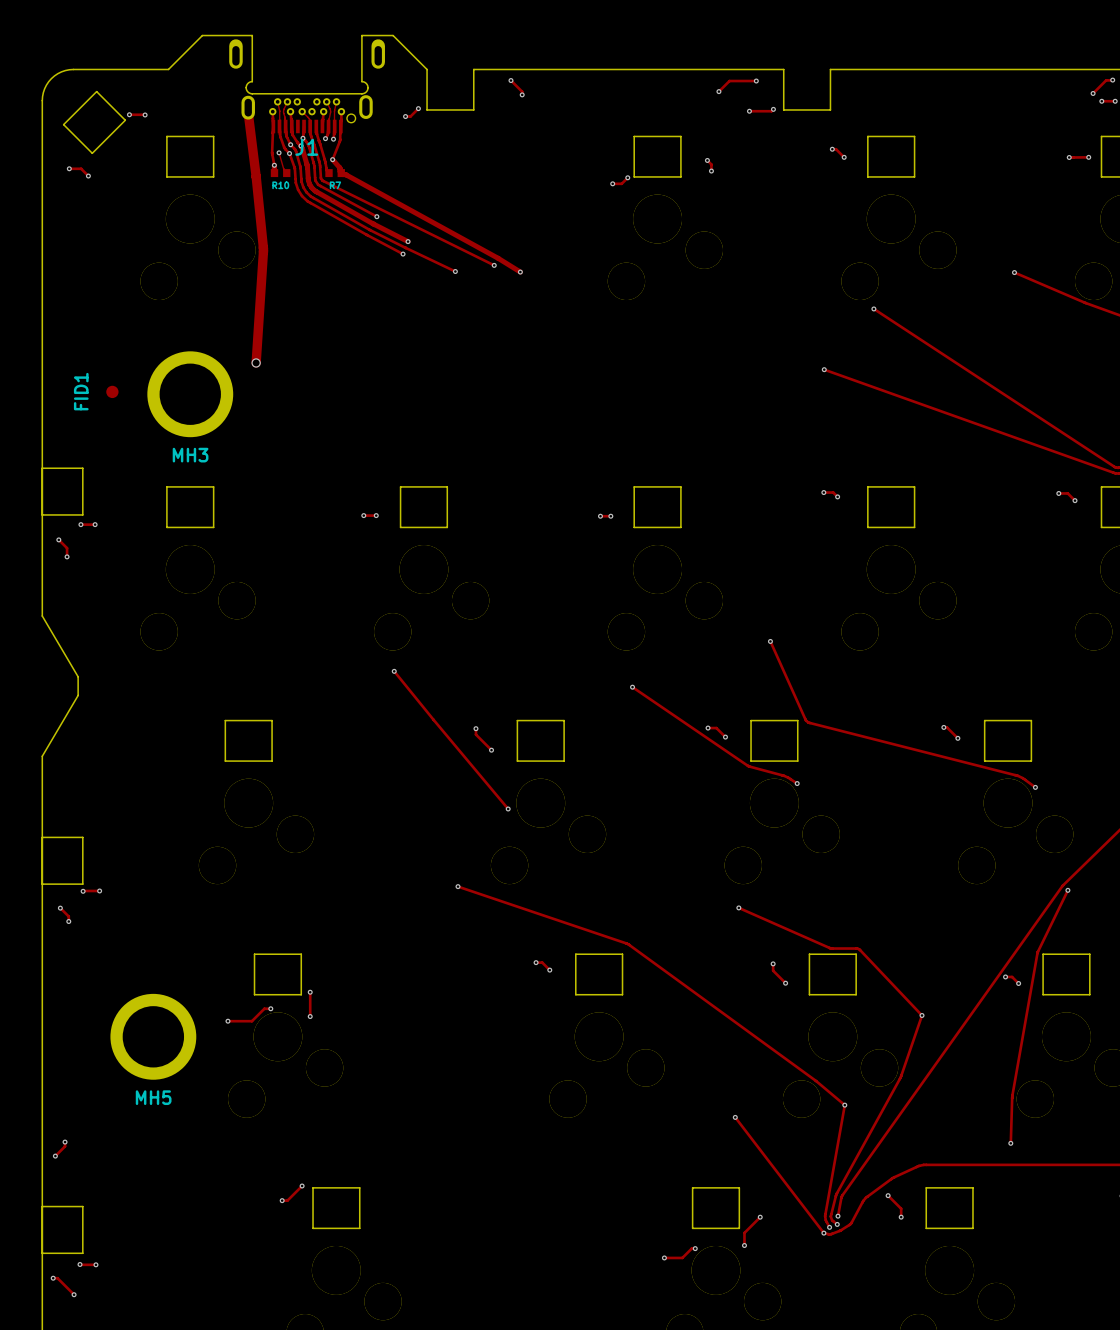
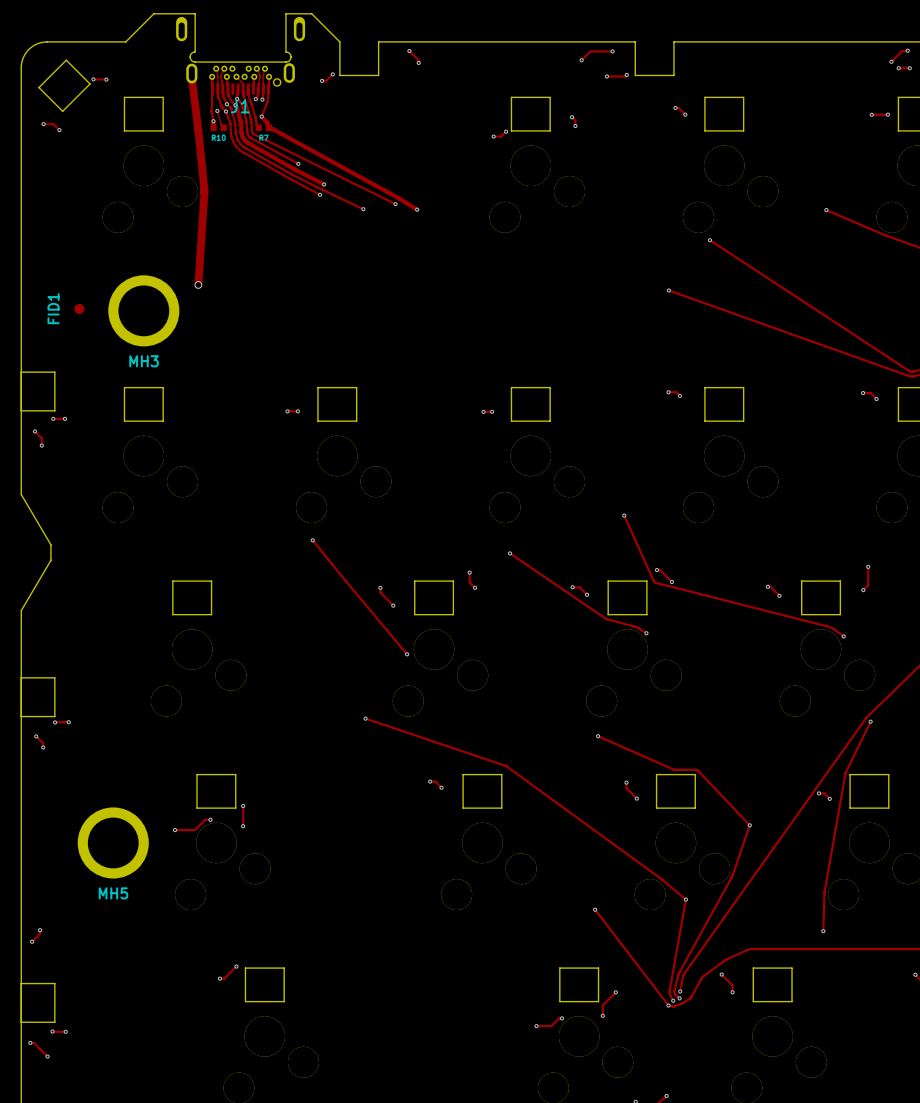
track: none -> (868, 566) (868, 585) (863, 590)
via: none -> (868, 566)
track: none -> (656, 570) (660, 570) (671, 581)
via: none -> (656, 570)
track: none -> (469, 572) (469, 582) (475, 587)
via: none -> (469, 572)
via: none -> (671, 581)
via: none -> (475, 587)
via: none -> (863, 590)

